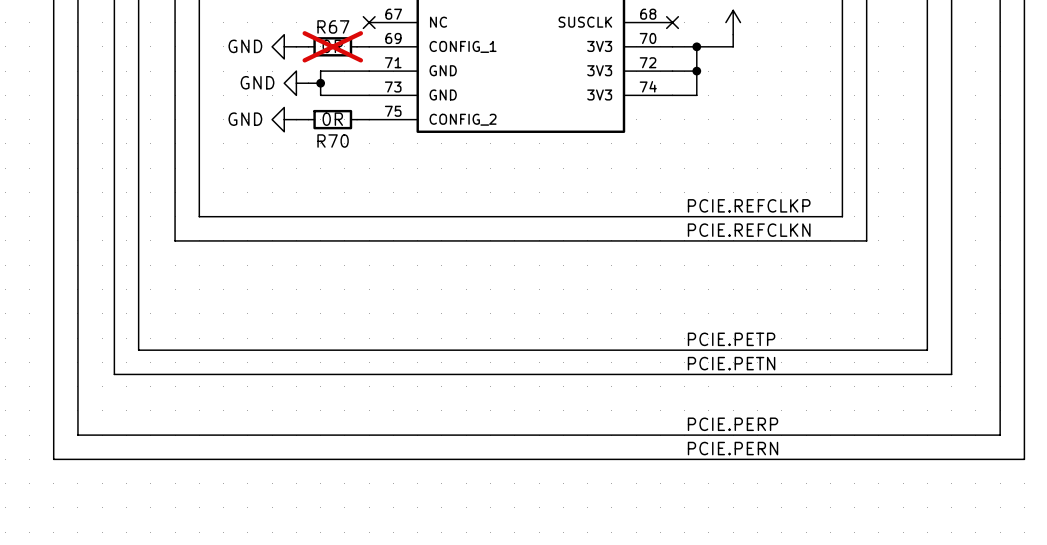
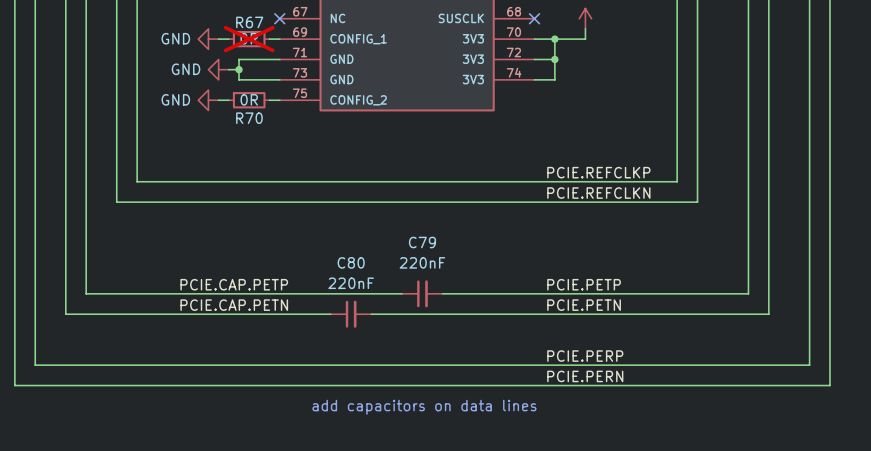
label: none -> PCIE.CAP.PETP (234, 284)
C79: none -> (422, 293)
label: none -> PCIE.CAP.PETN (234, 305)
C80: none -> (351, 314)
text: none -> add capacitors on data lines (424, 407)

